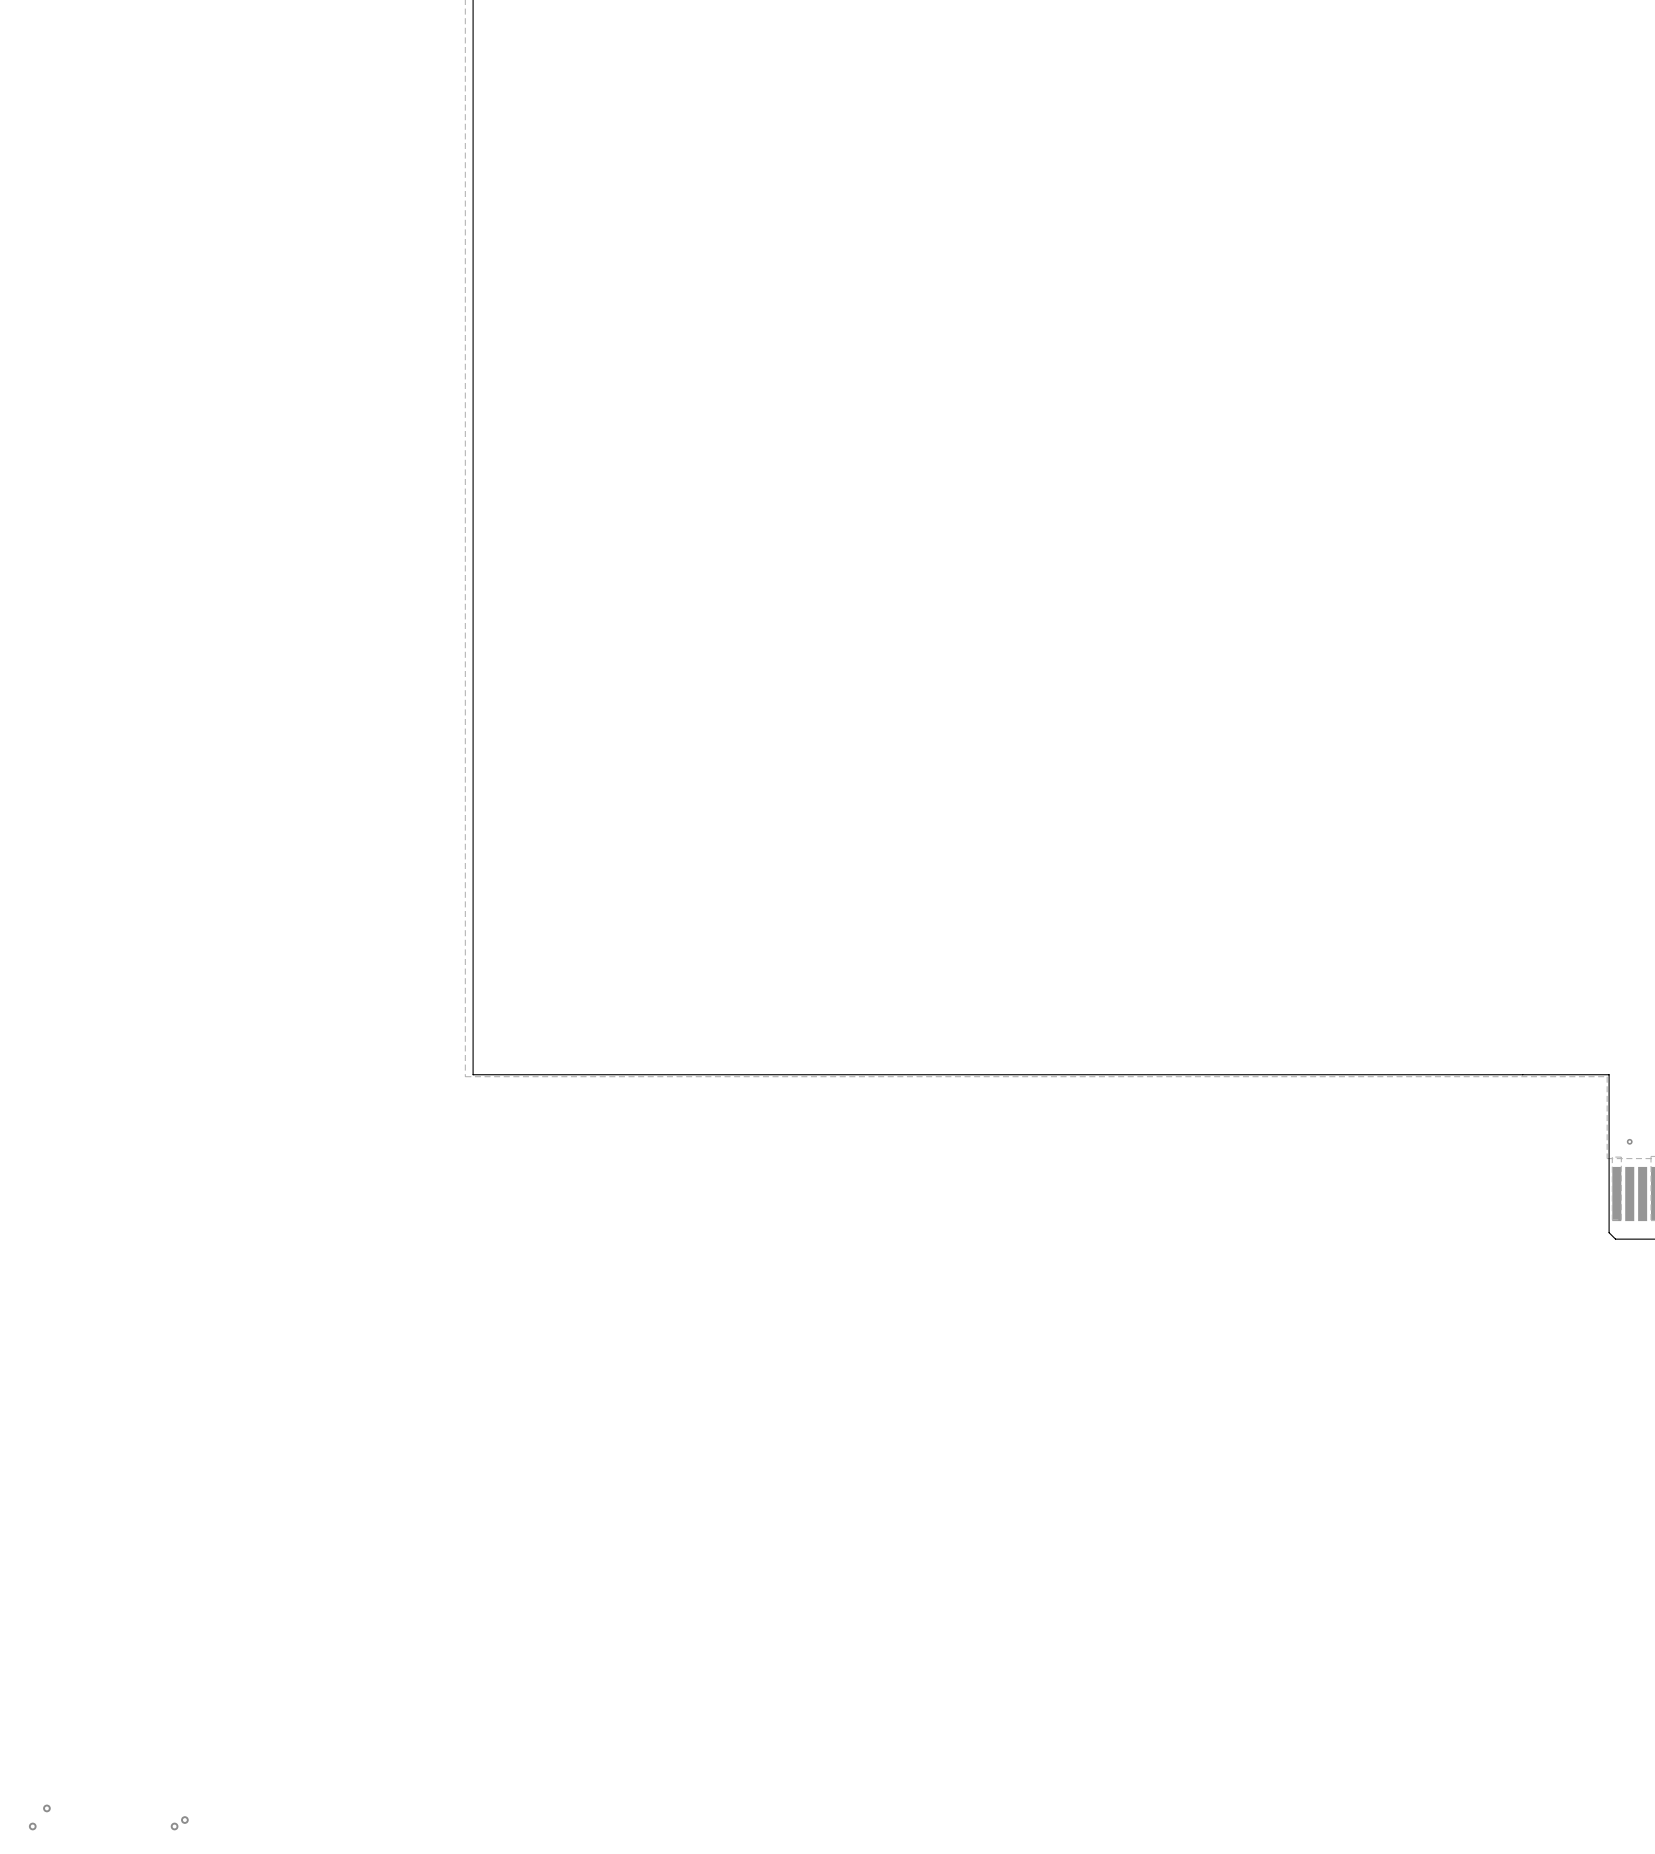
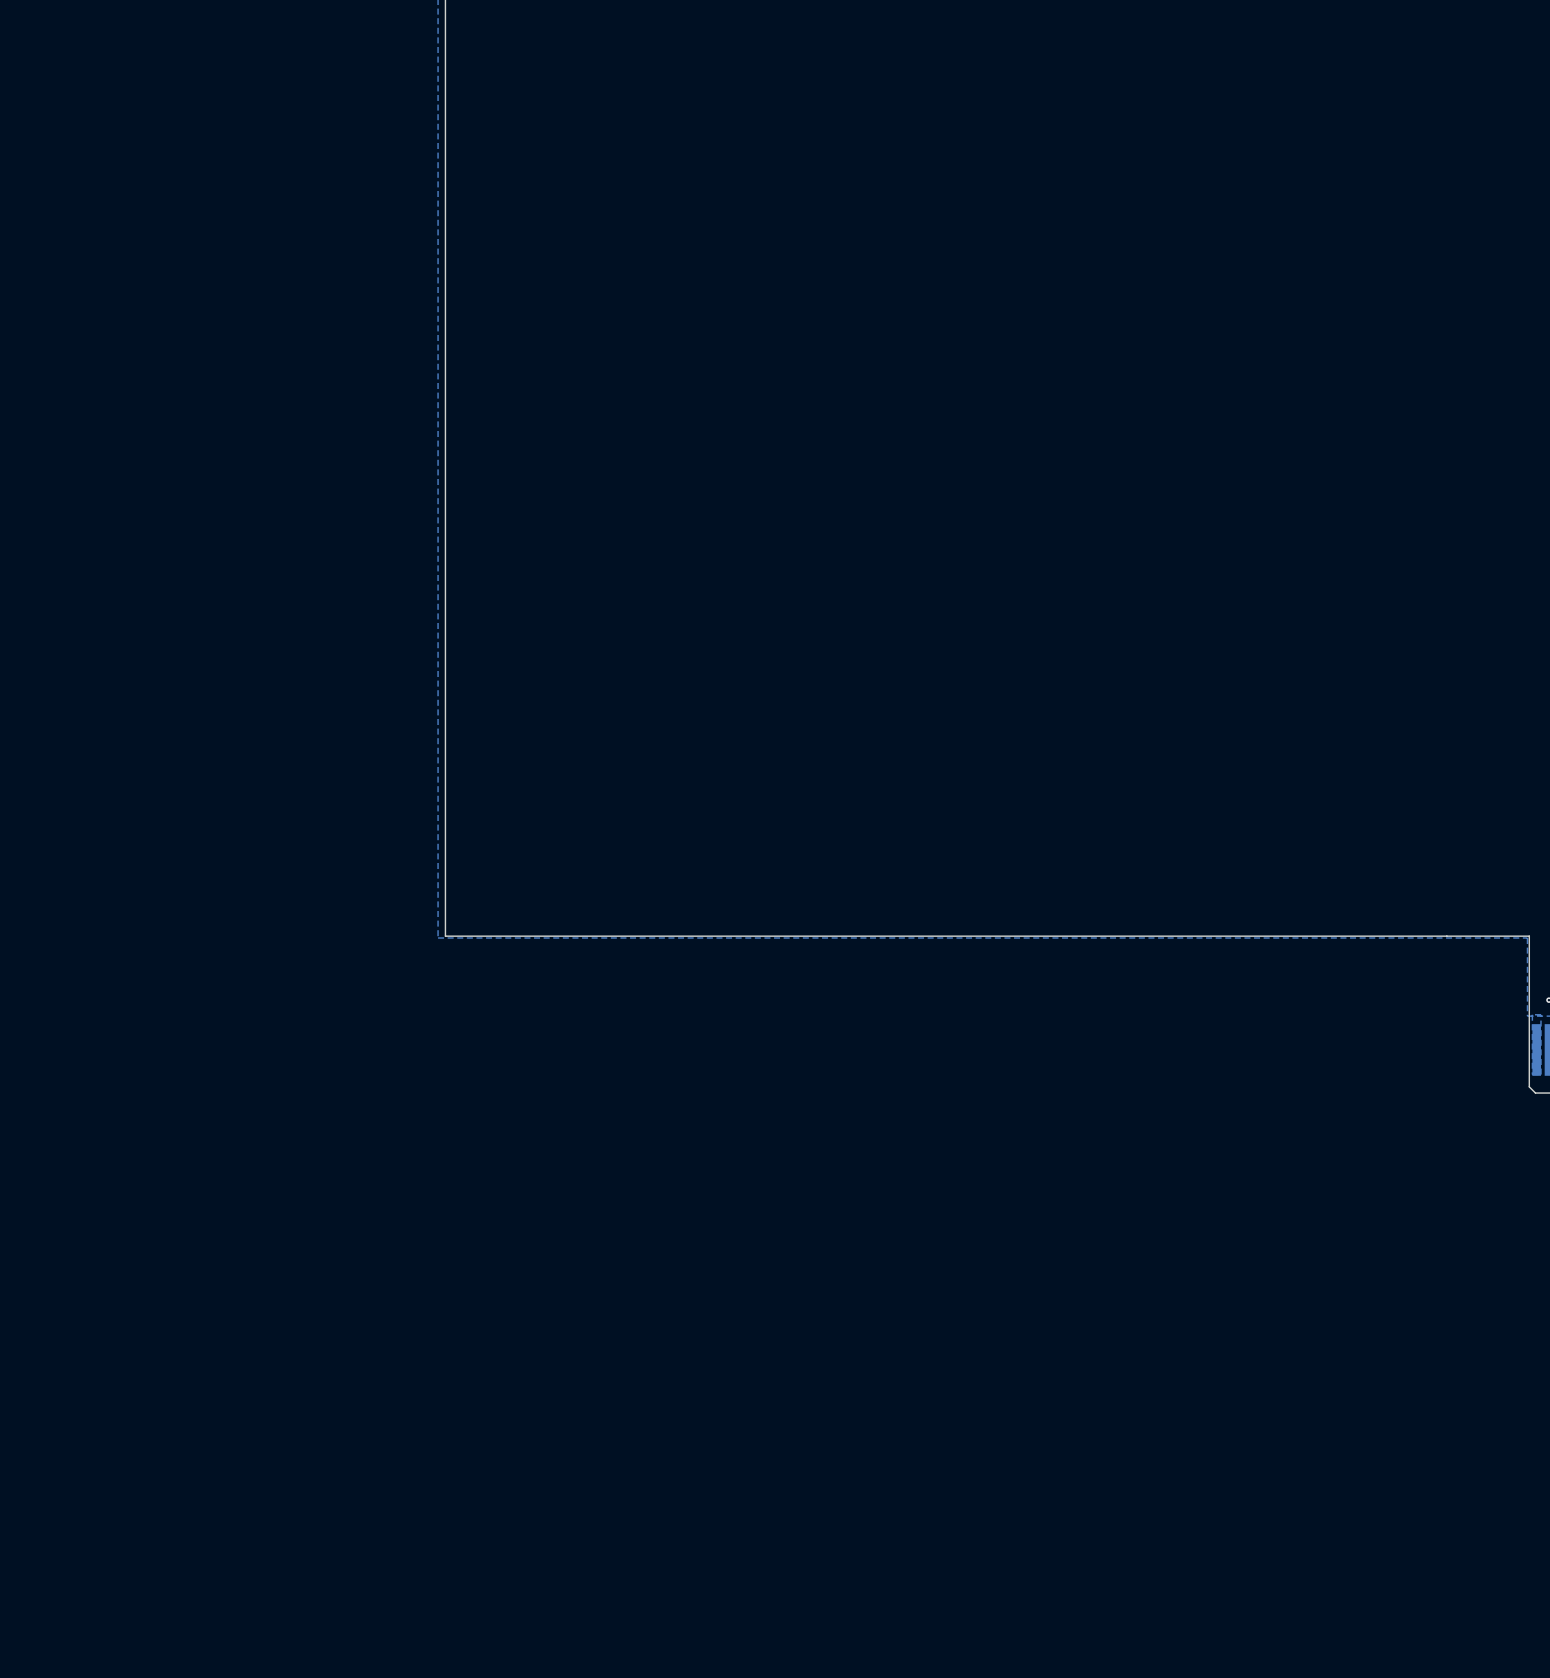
via: (46, 1808) -> none
via: (184, 1820) -> none
via: (32, 1826) -> none
via: (174, 1826) -> none

